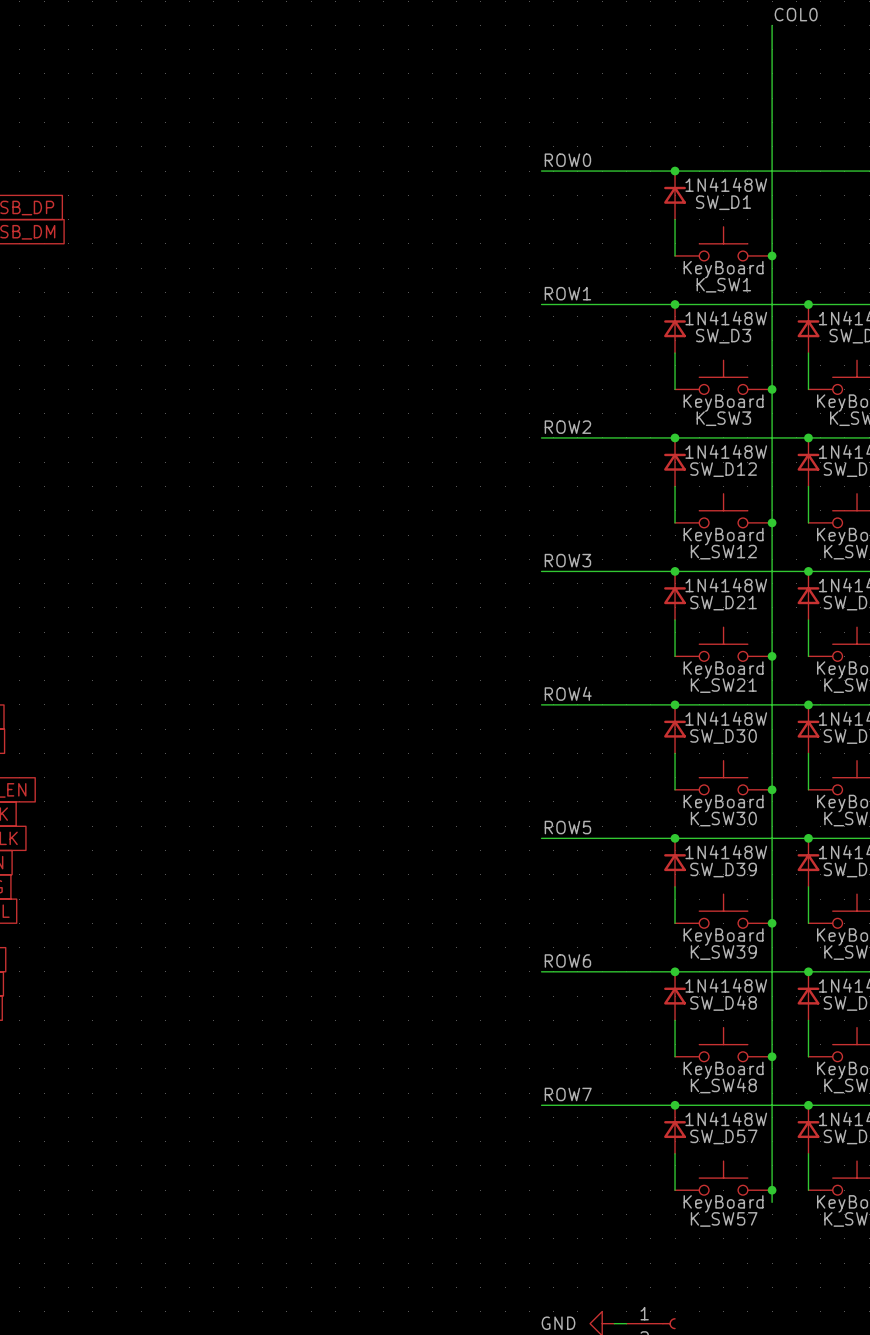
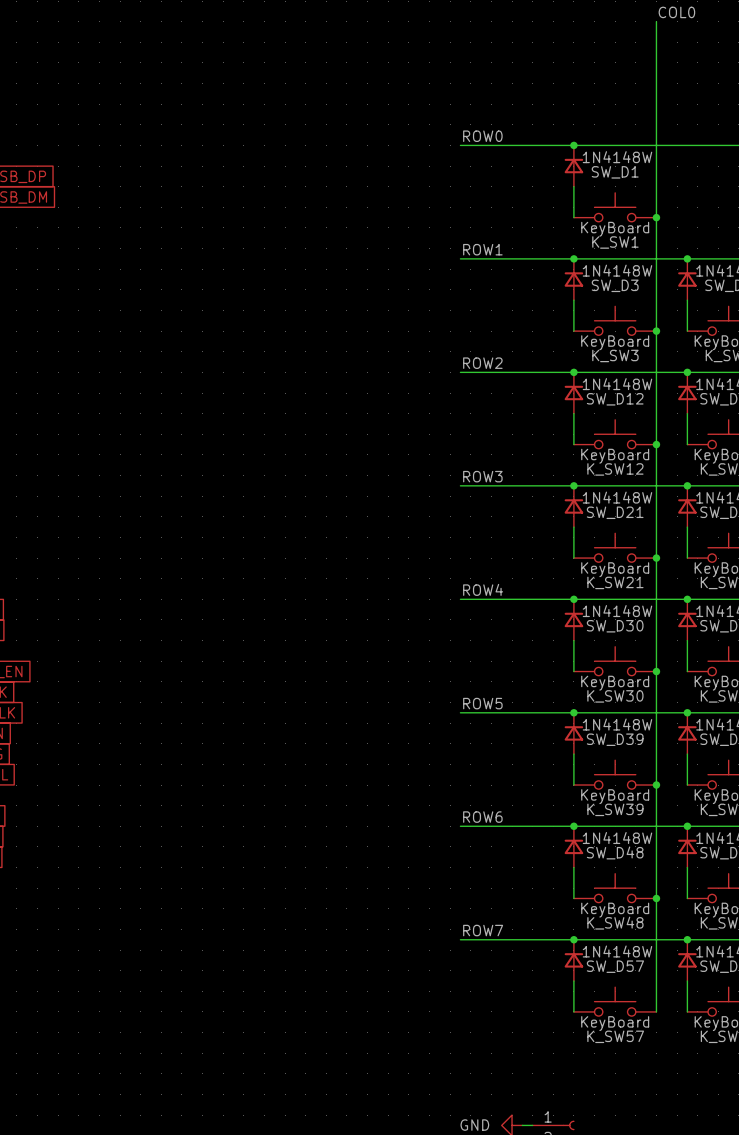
wire: (772, 1190) (772, 1202) -> none
junction: (772, 1190) -> none

